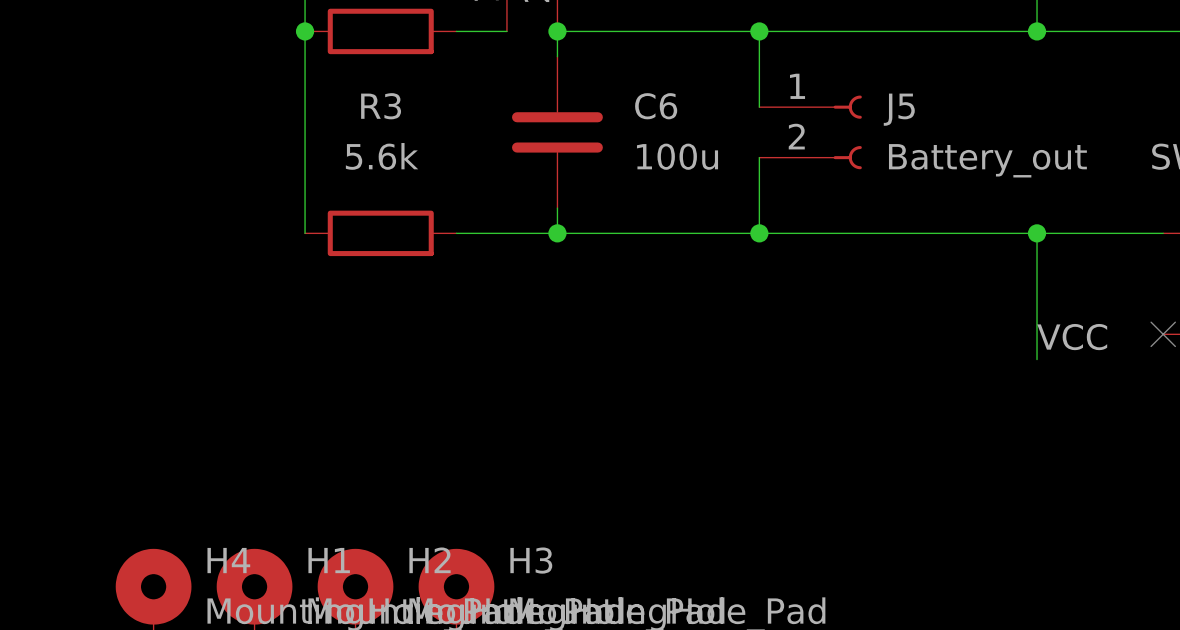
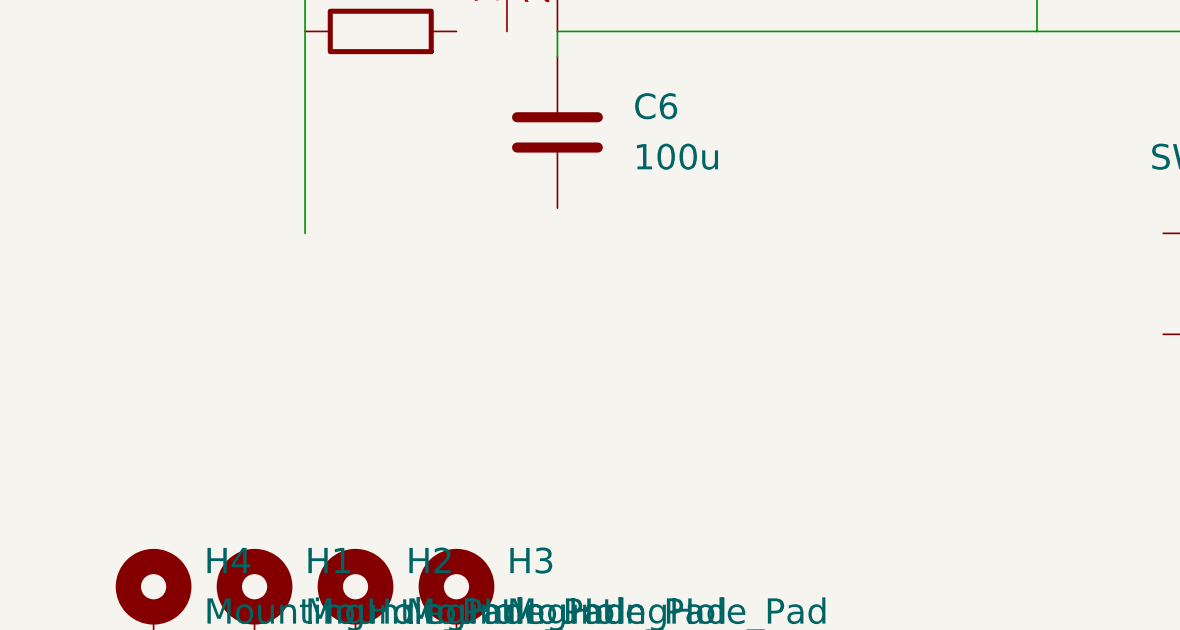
junction: (305, 31) -> none
wire: (456, 31) (506, 31) -> none
junction: (557, 31) -> none
wire: (759, 31) (759, 107) -> none
junction: (759, 31) -> none
junction: (1037, 31) -> none
J5: Battery_out (810, 132) -> none
wire: (759, 157) (759, 233) -> none
wire: (557, 208) (557, 233) -> none
R3: 5.6k (380, 233) -> none
wire: (456, 233) (1163, 233) -> none
junction: (557, 233) -> none
junction: (759, 233) -> none
wire: (1037, 233) (1037, 359) -> none
junction: (1037, 233) -> none
no-connect mark: (1163, 334) -> none
label: VCC (1072, 337) -> none

